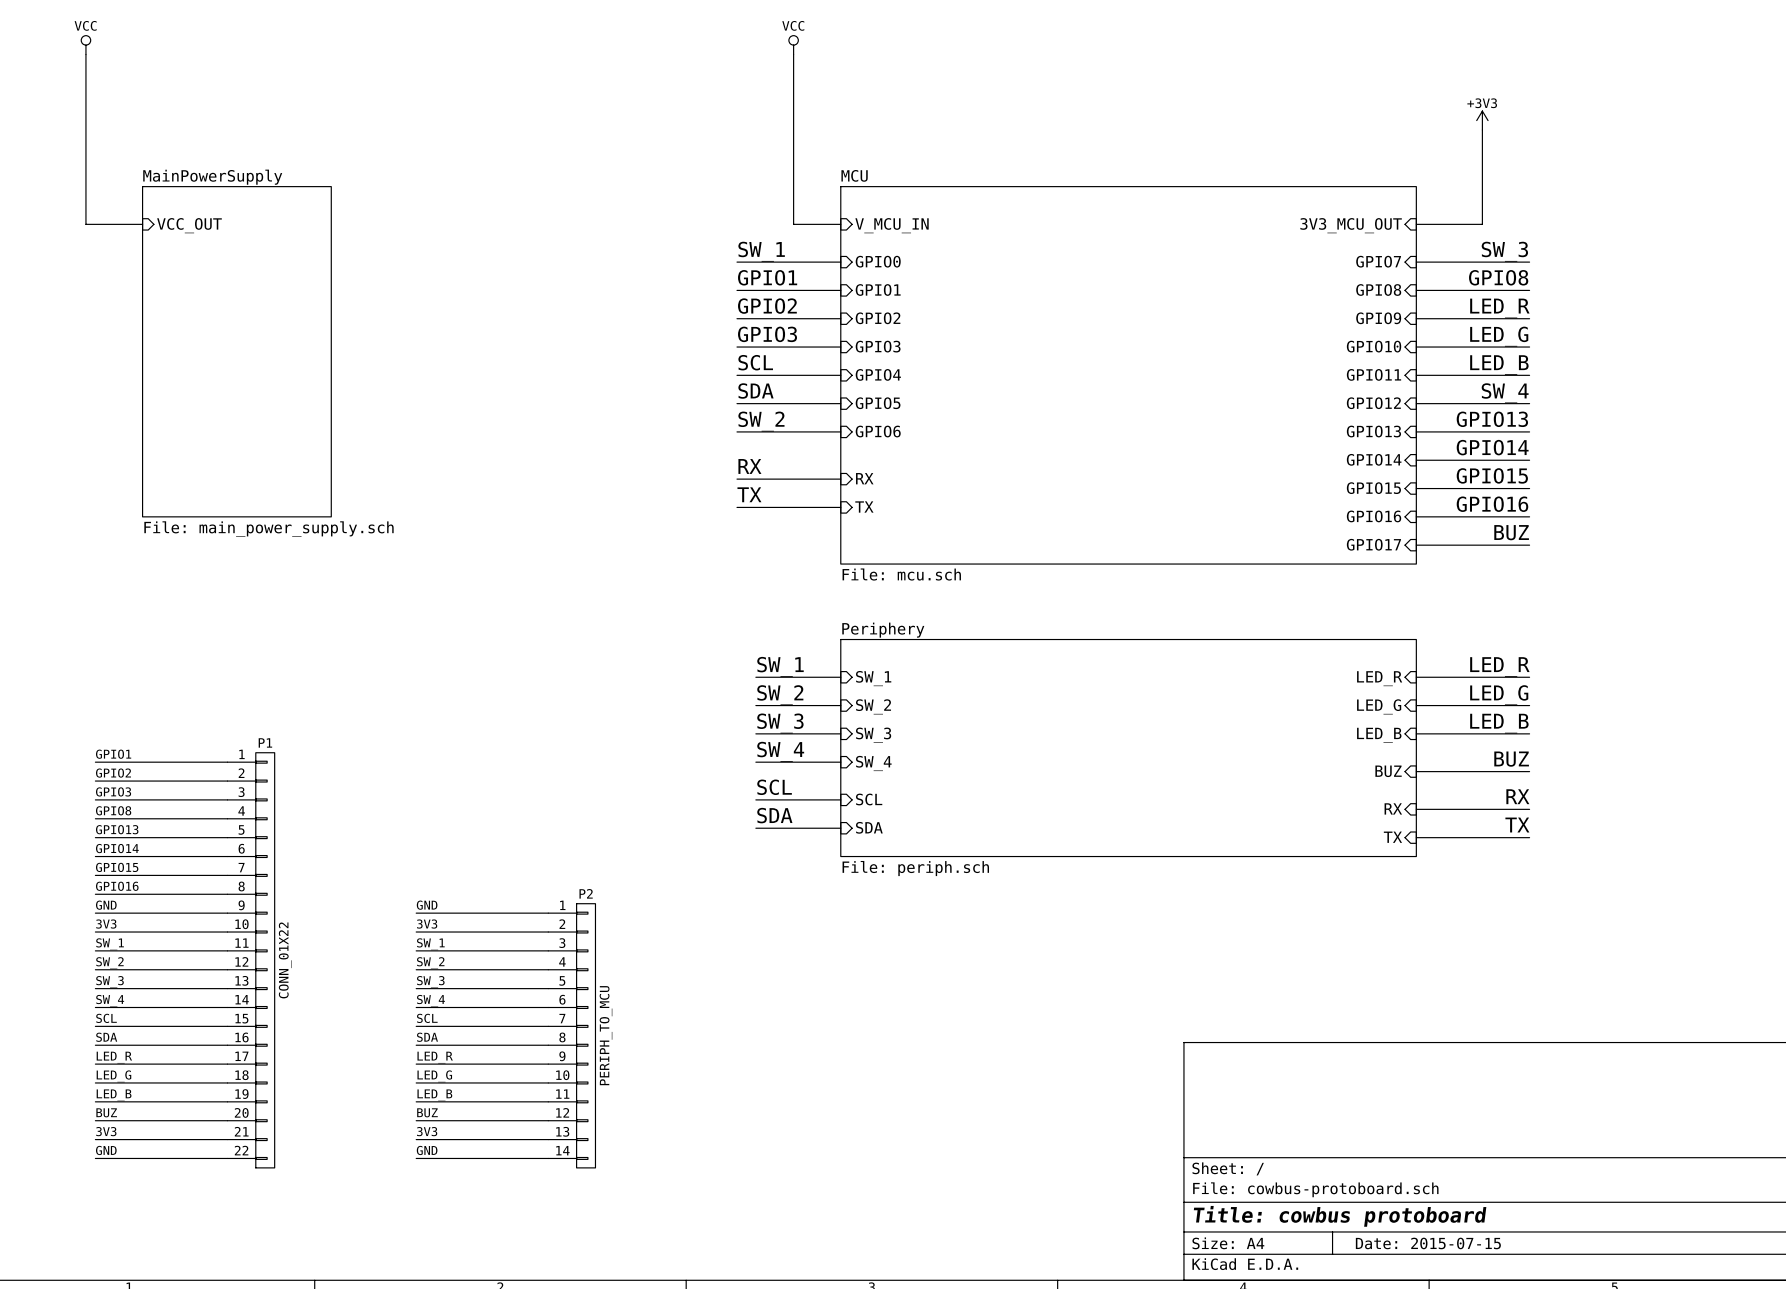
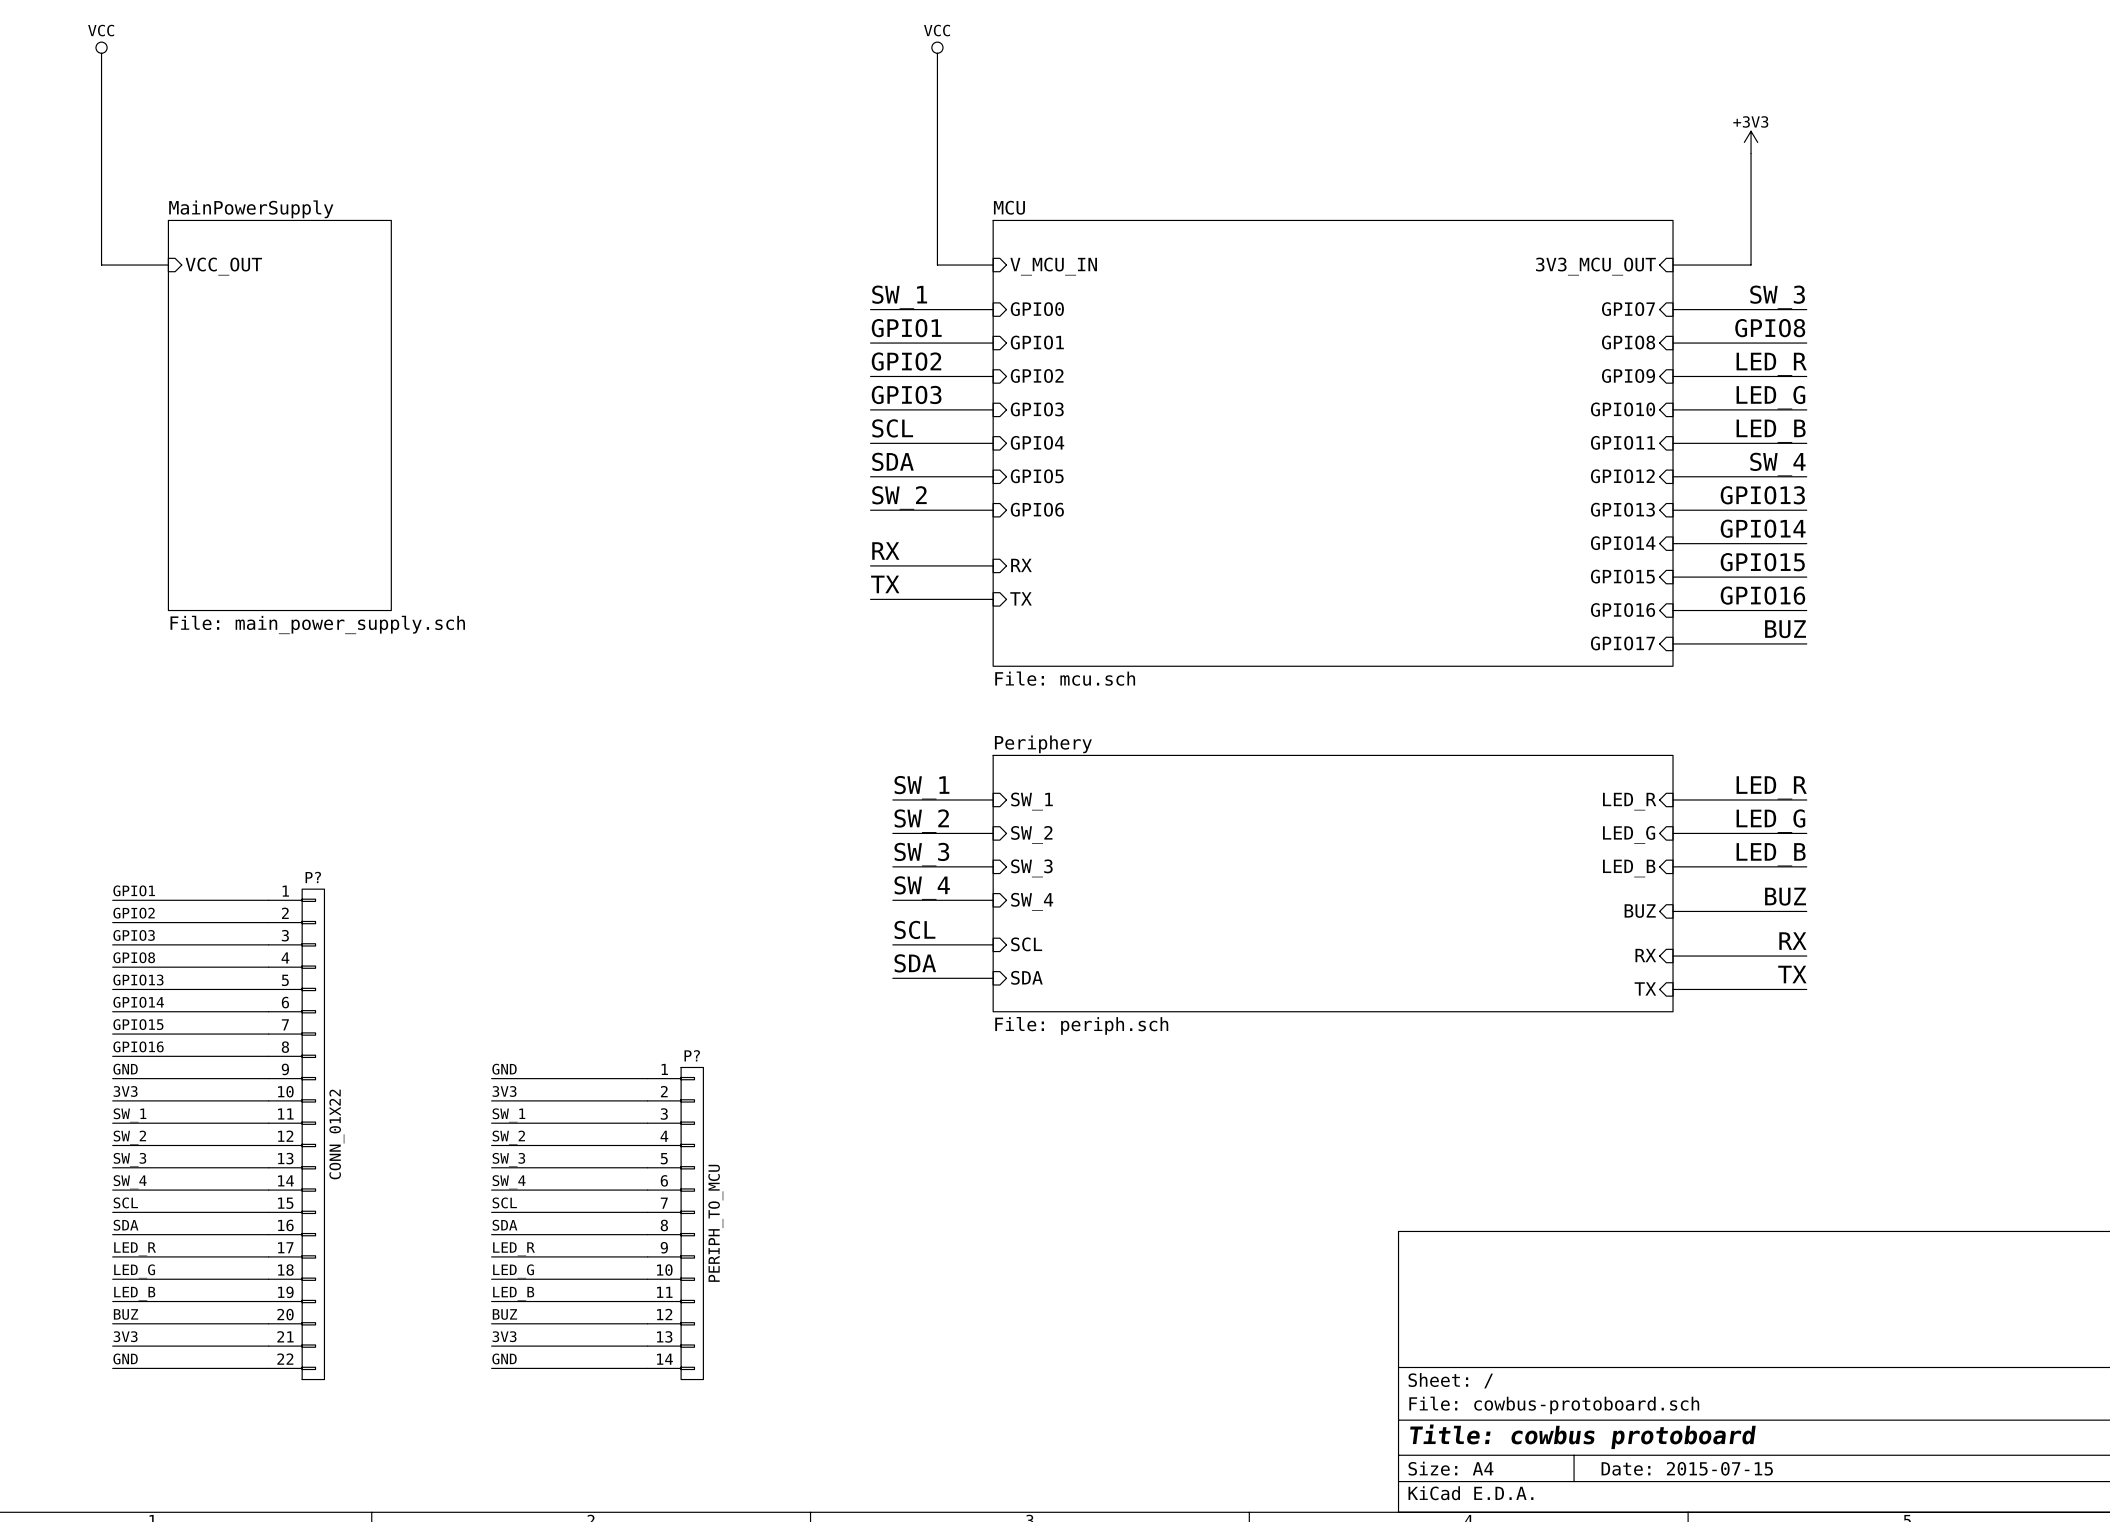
P1 name: P1 (265, 742) -> P? (313, 877)
P2 name: P2 (586, 893) -> P? (692, 1055)

